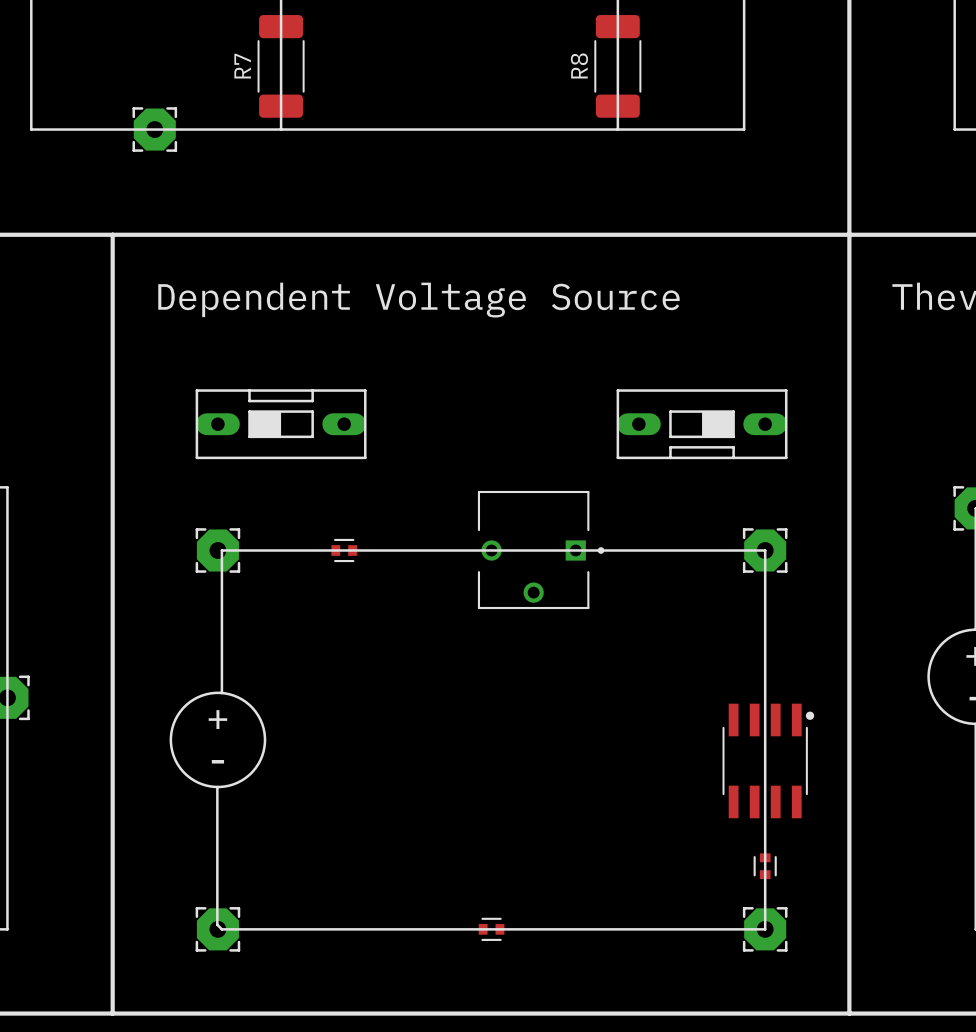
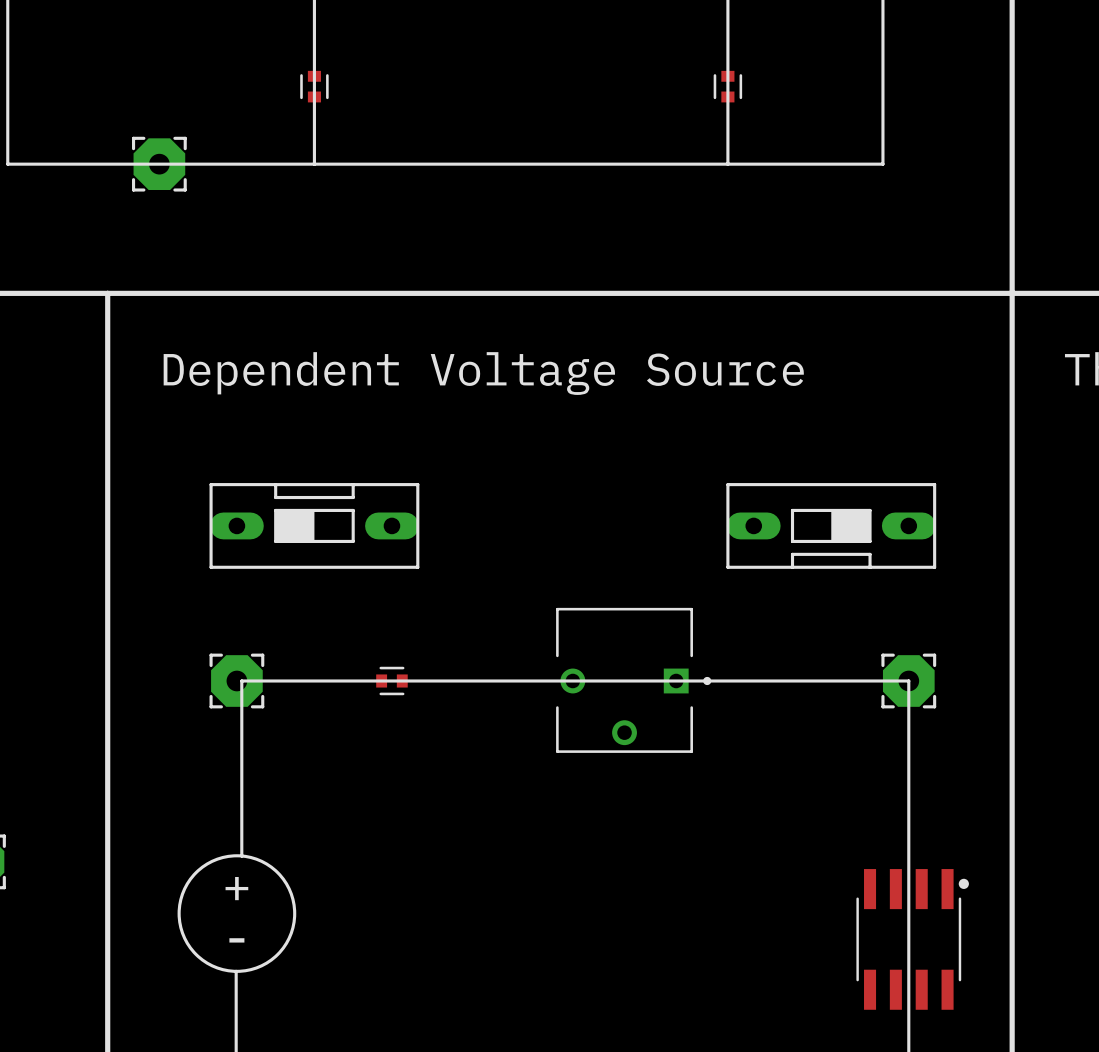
R7: (281, 66) -> none
part: none -> (314, 86)
R8: (617, 66) -> none
part: none -> (727, 86)

